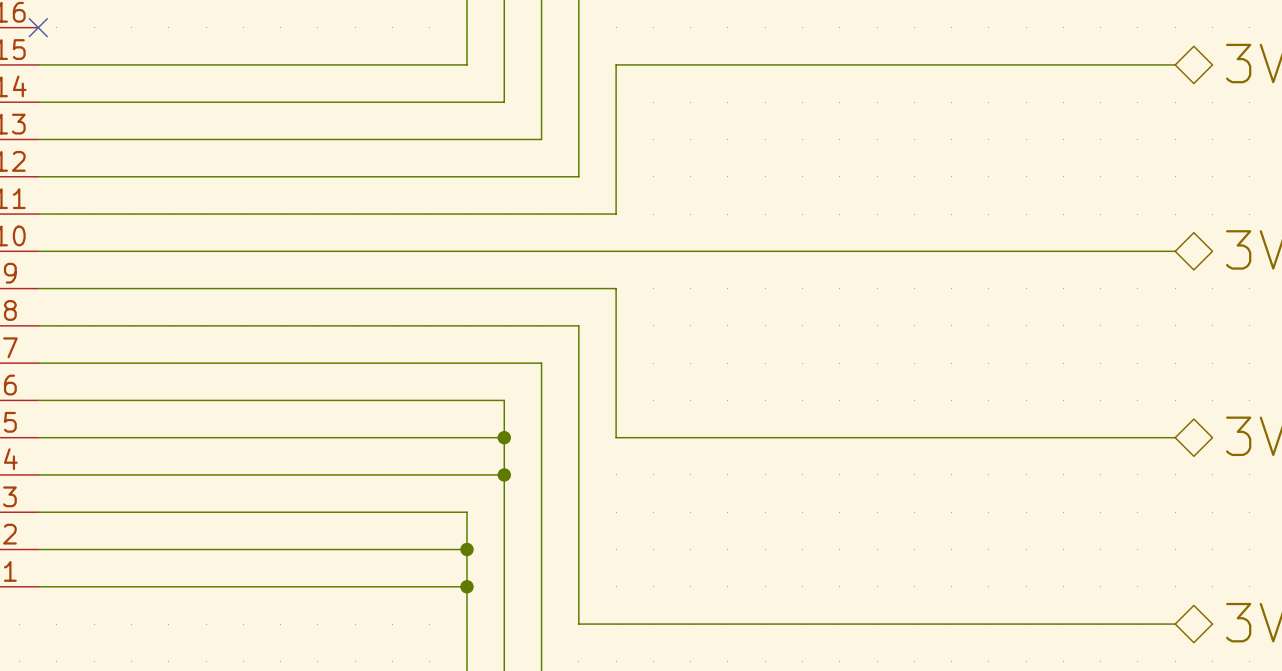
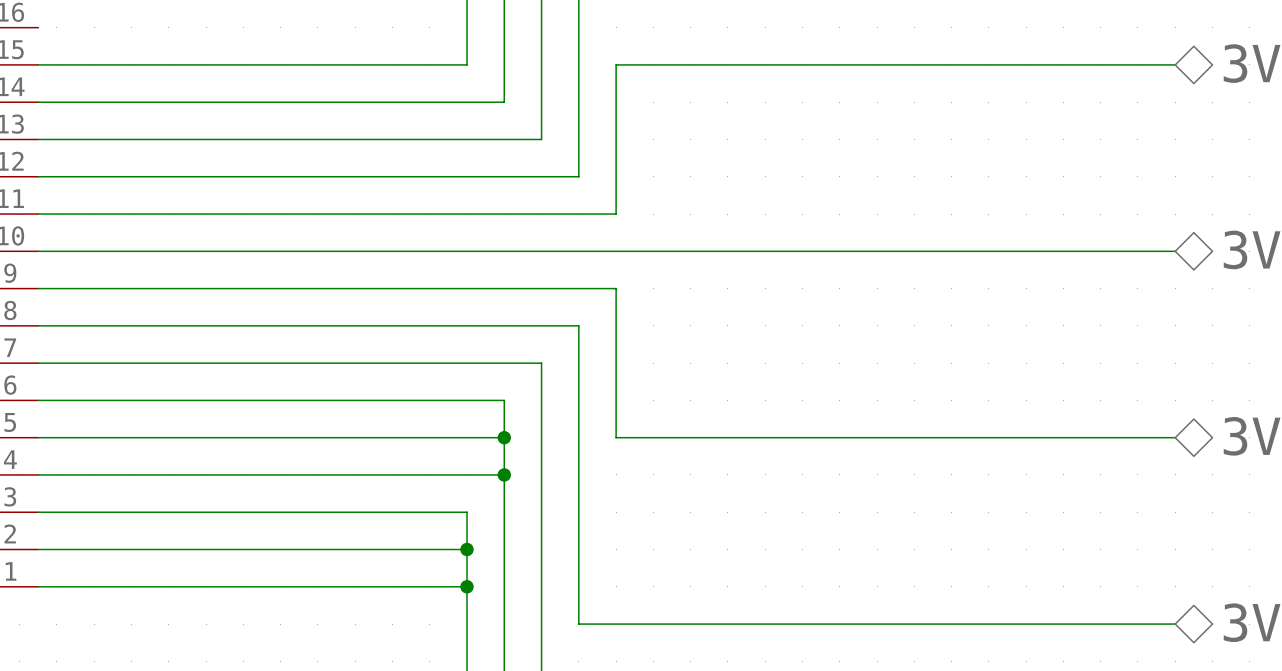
no-connect mark: (38, 27) -> none

